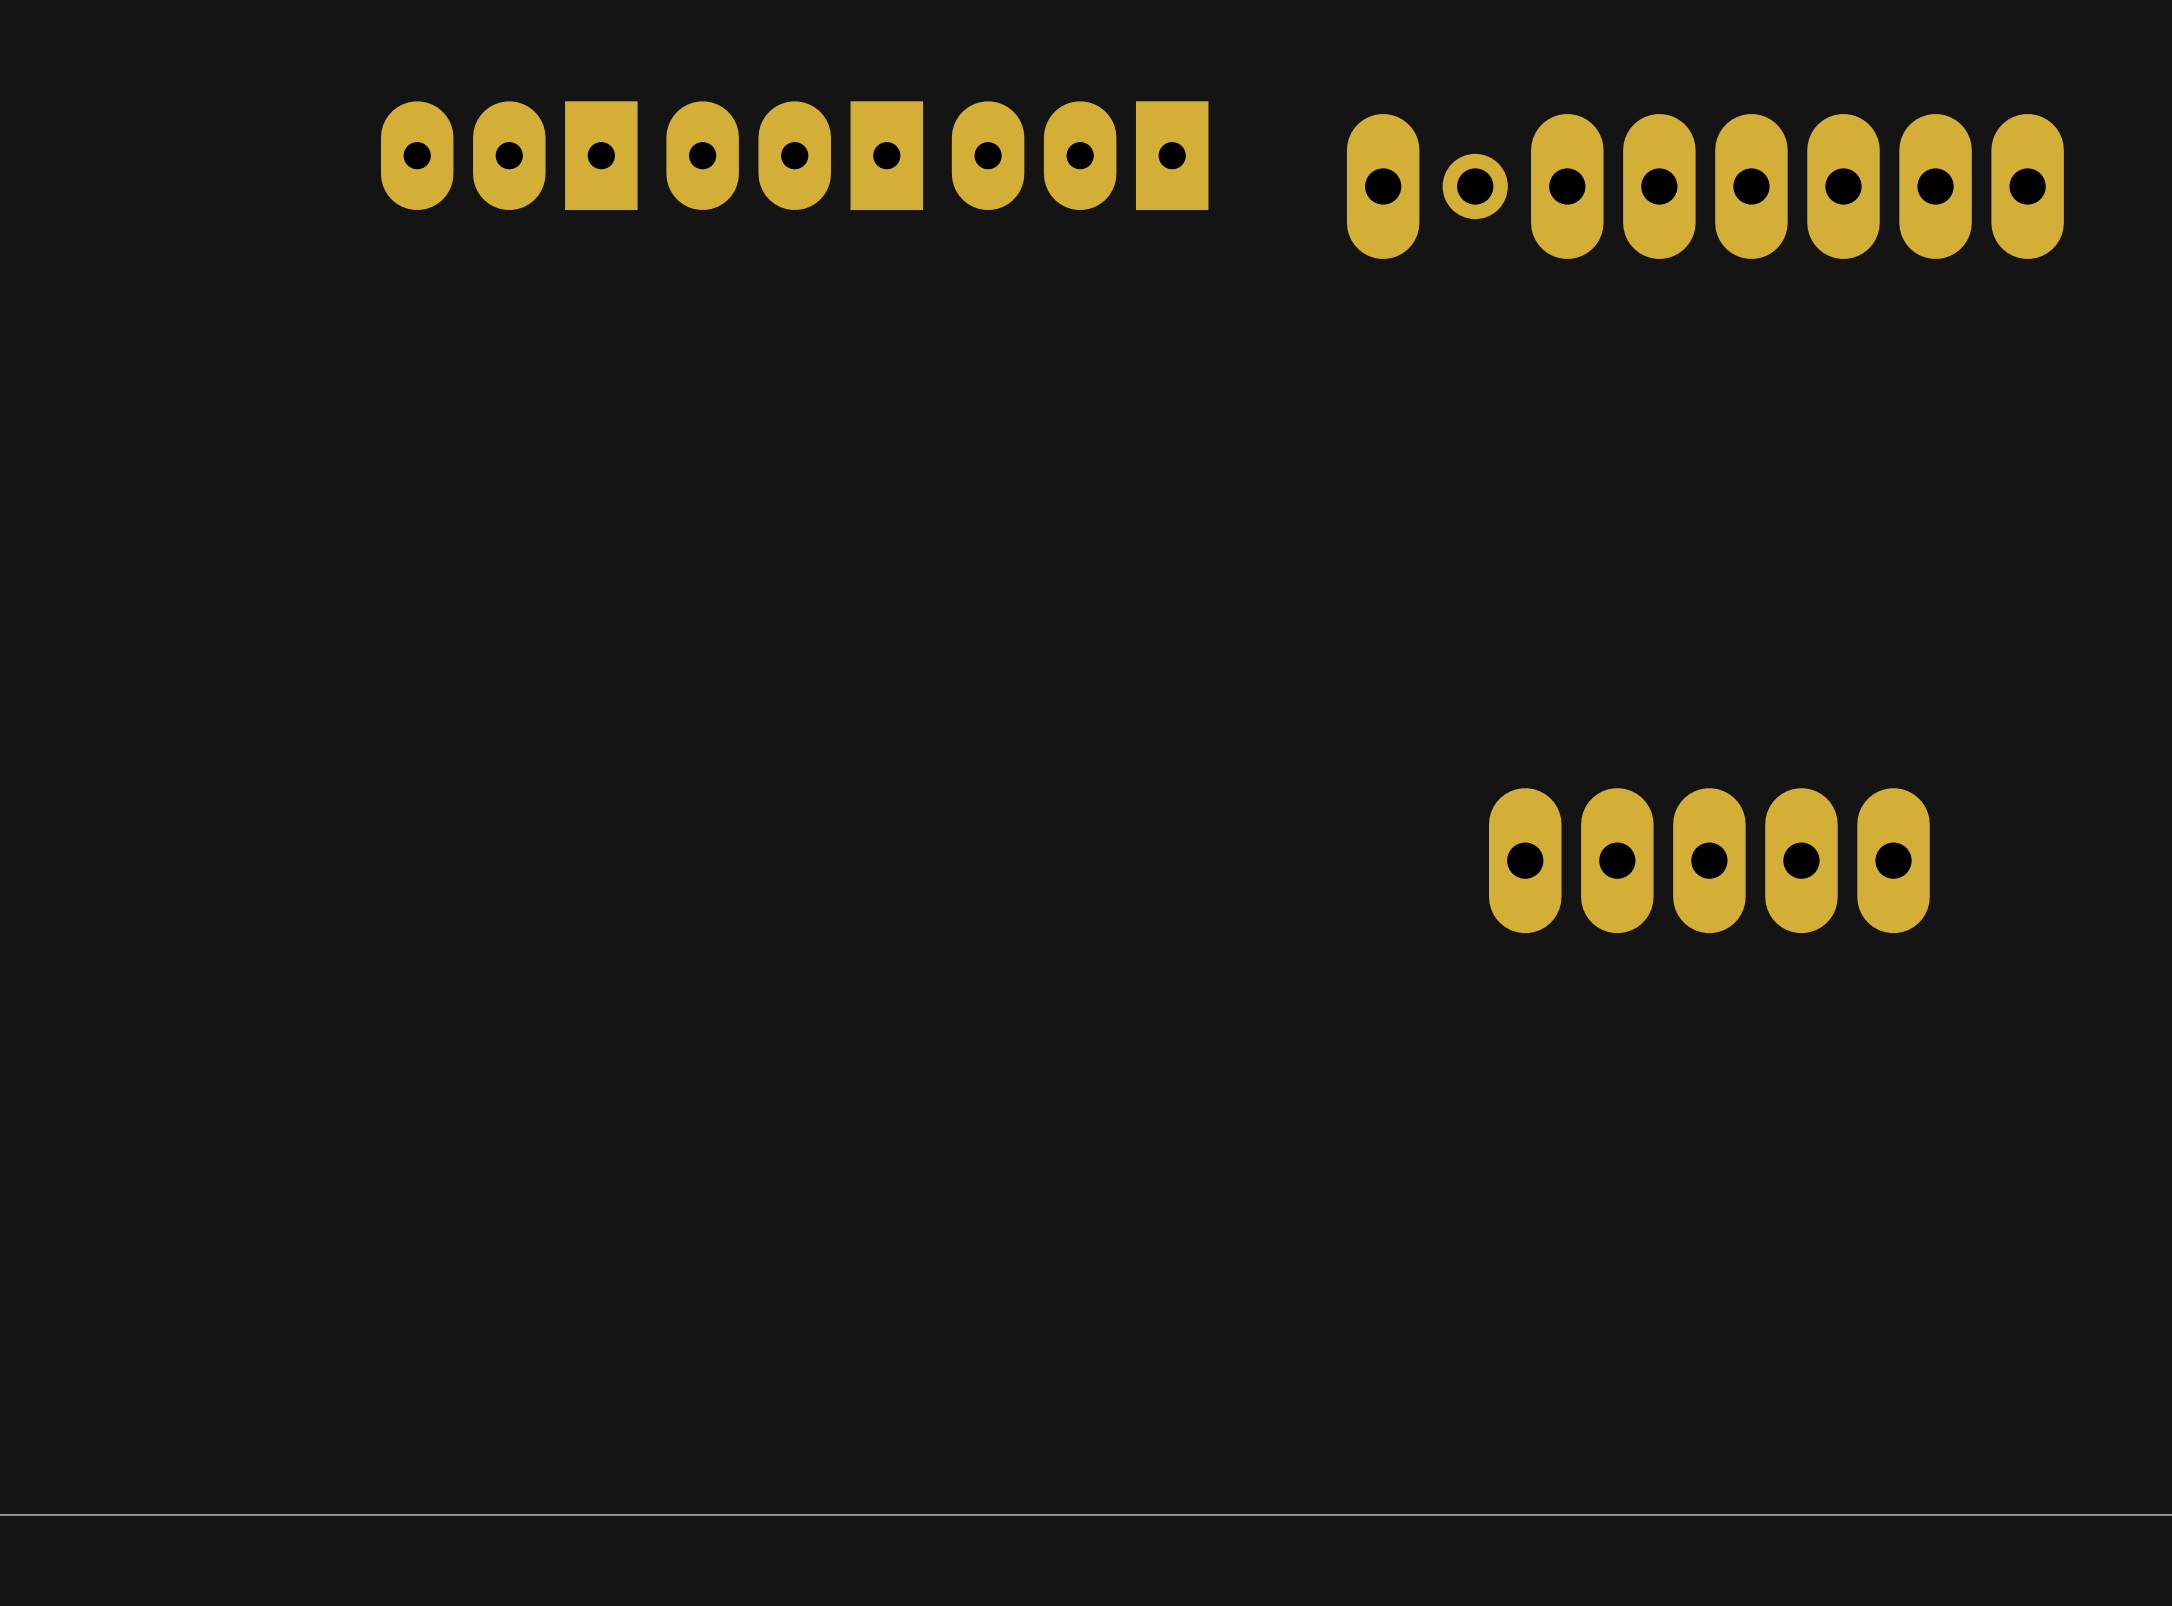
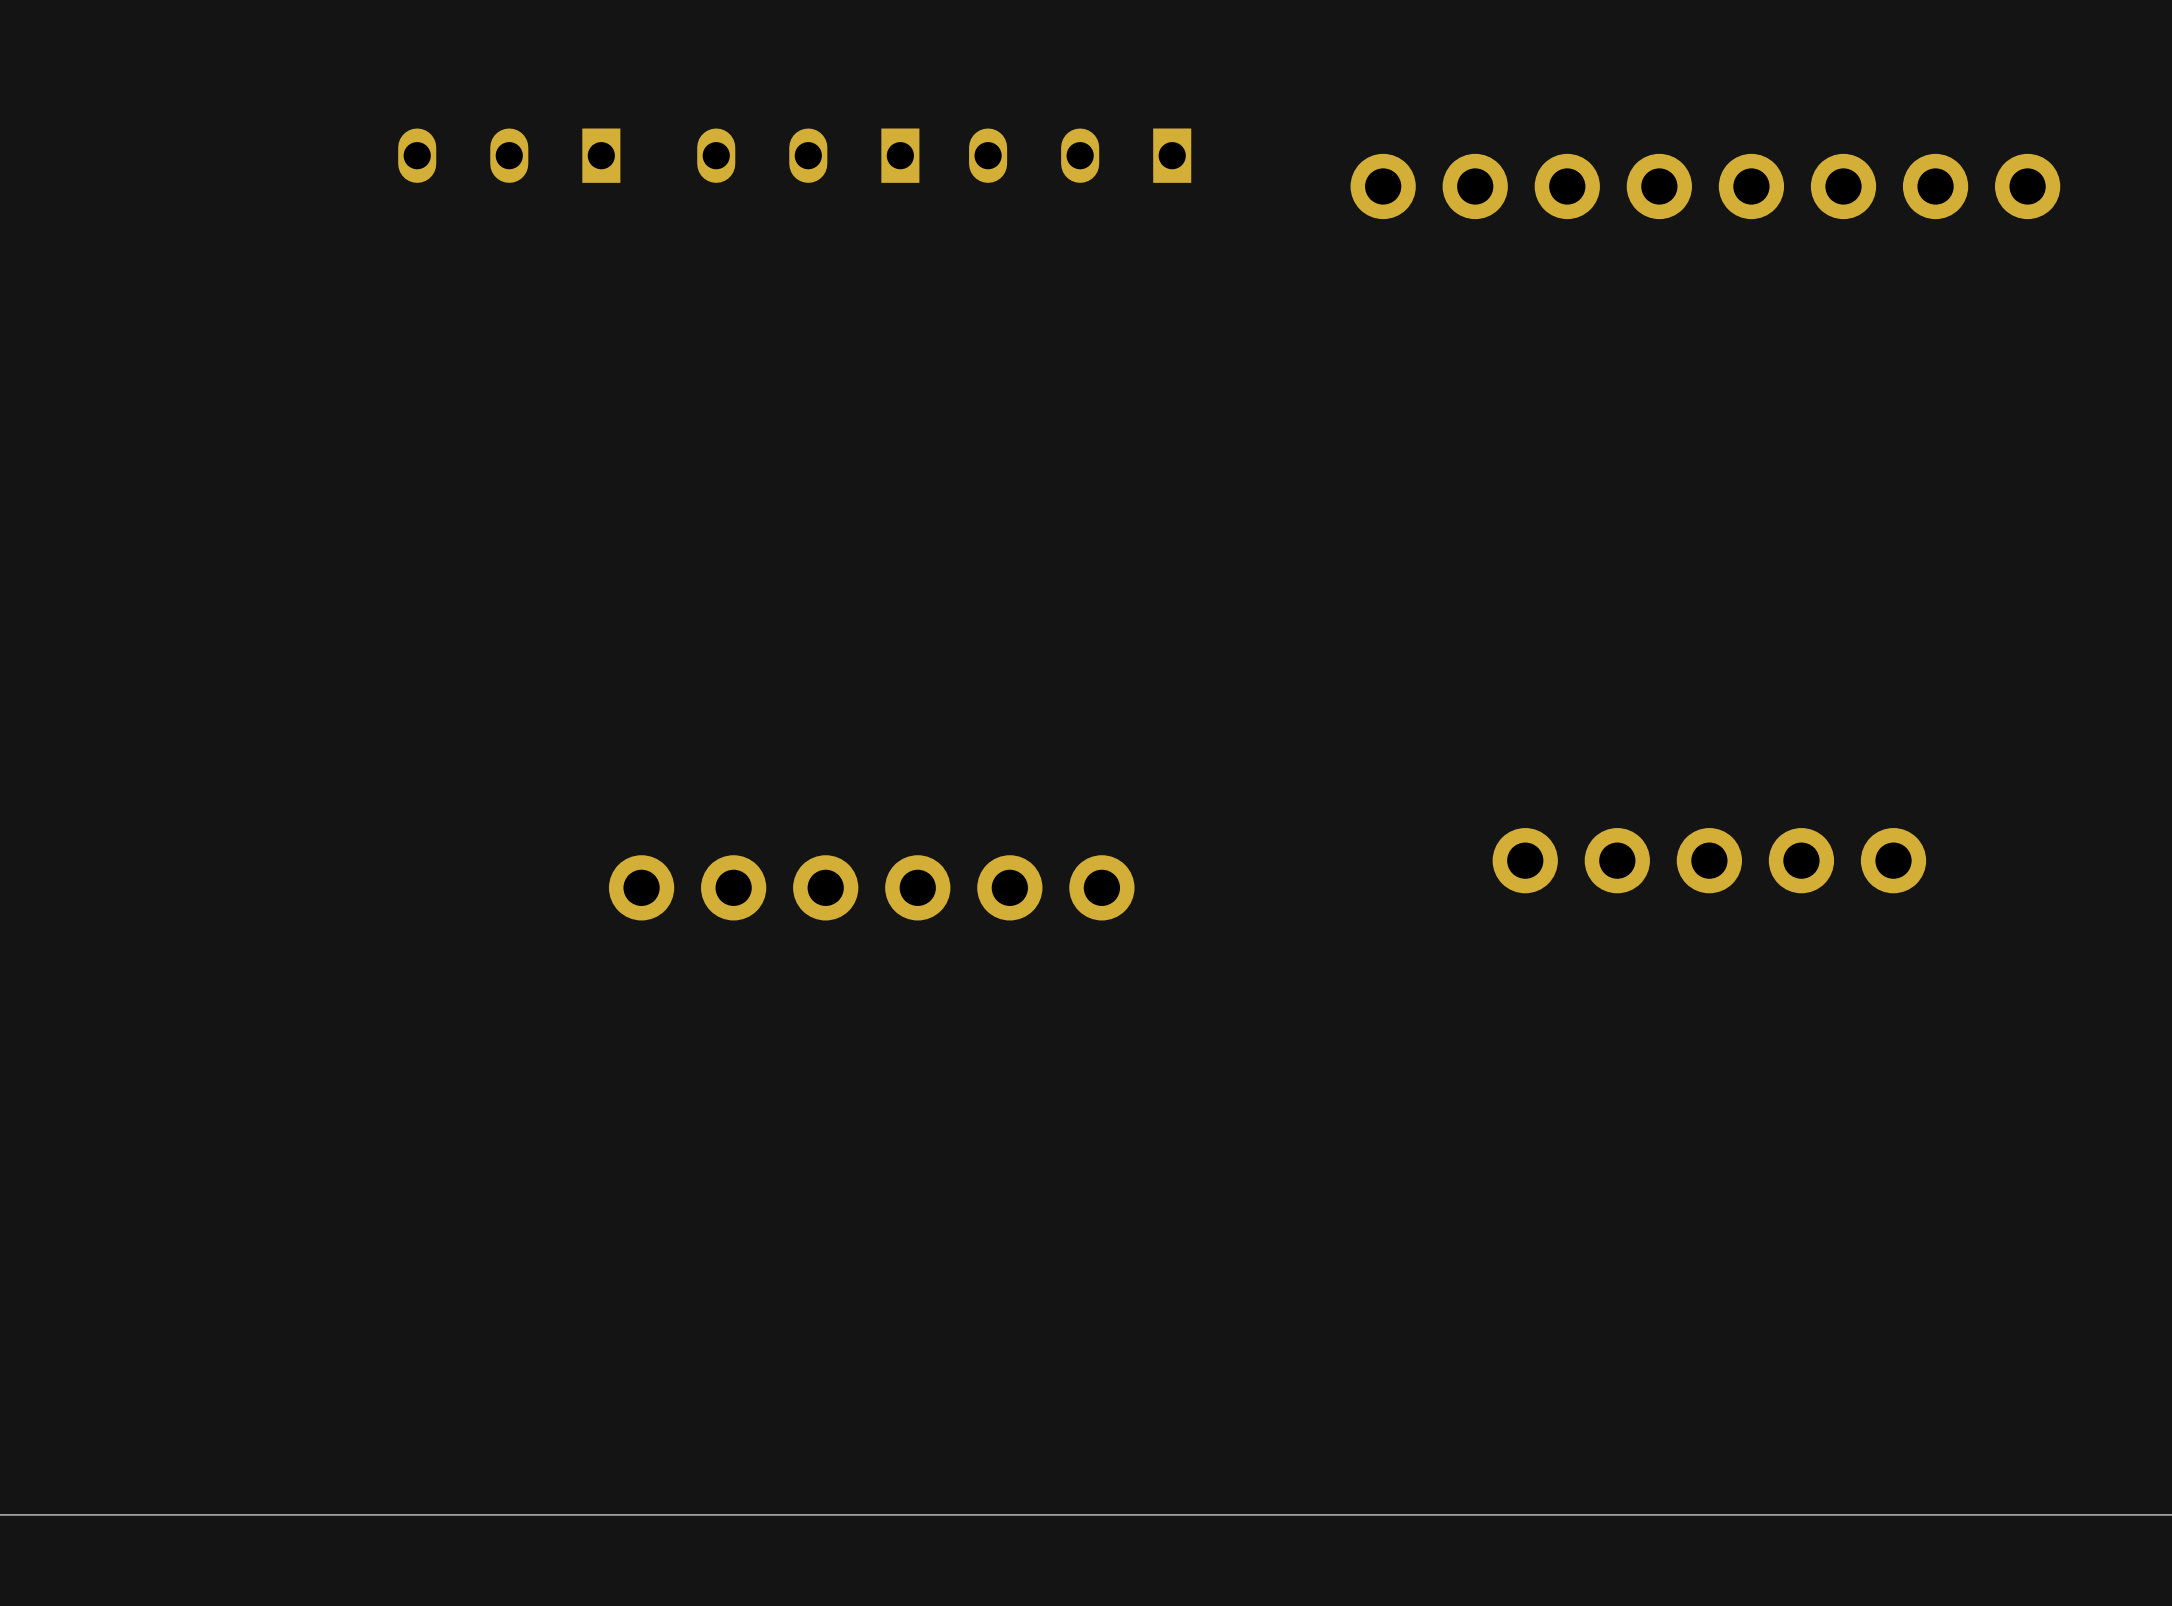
part footprint: [380, 101, 638, 211] -> [398, 128, 621, 183]
part footprint: [666, 101, 924, 211] -> [697, 128, 920, 183]
part footprint: [951, 101, 1209, 211] -> [969, 128, 1192, 183]
part footprint: [1346, 113, 2064, 259] -> [1350, 153, 2061, 220]
part footprint: [1489, 788, 1930, 934] -> [1492, 828, 1927, 894]
part: none -> (871, 887)

